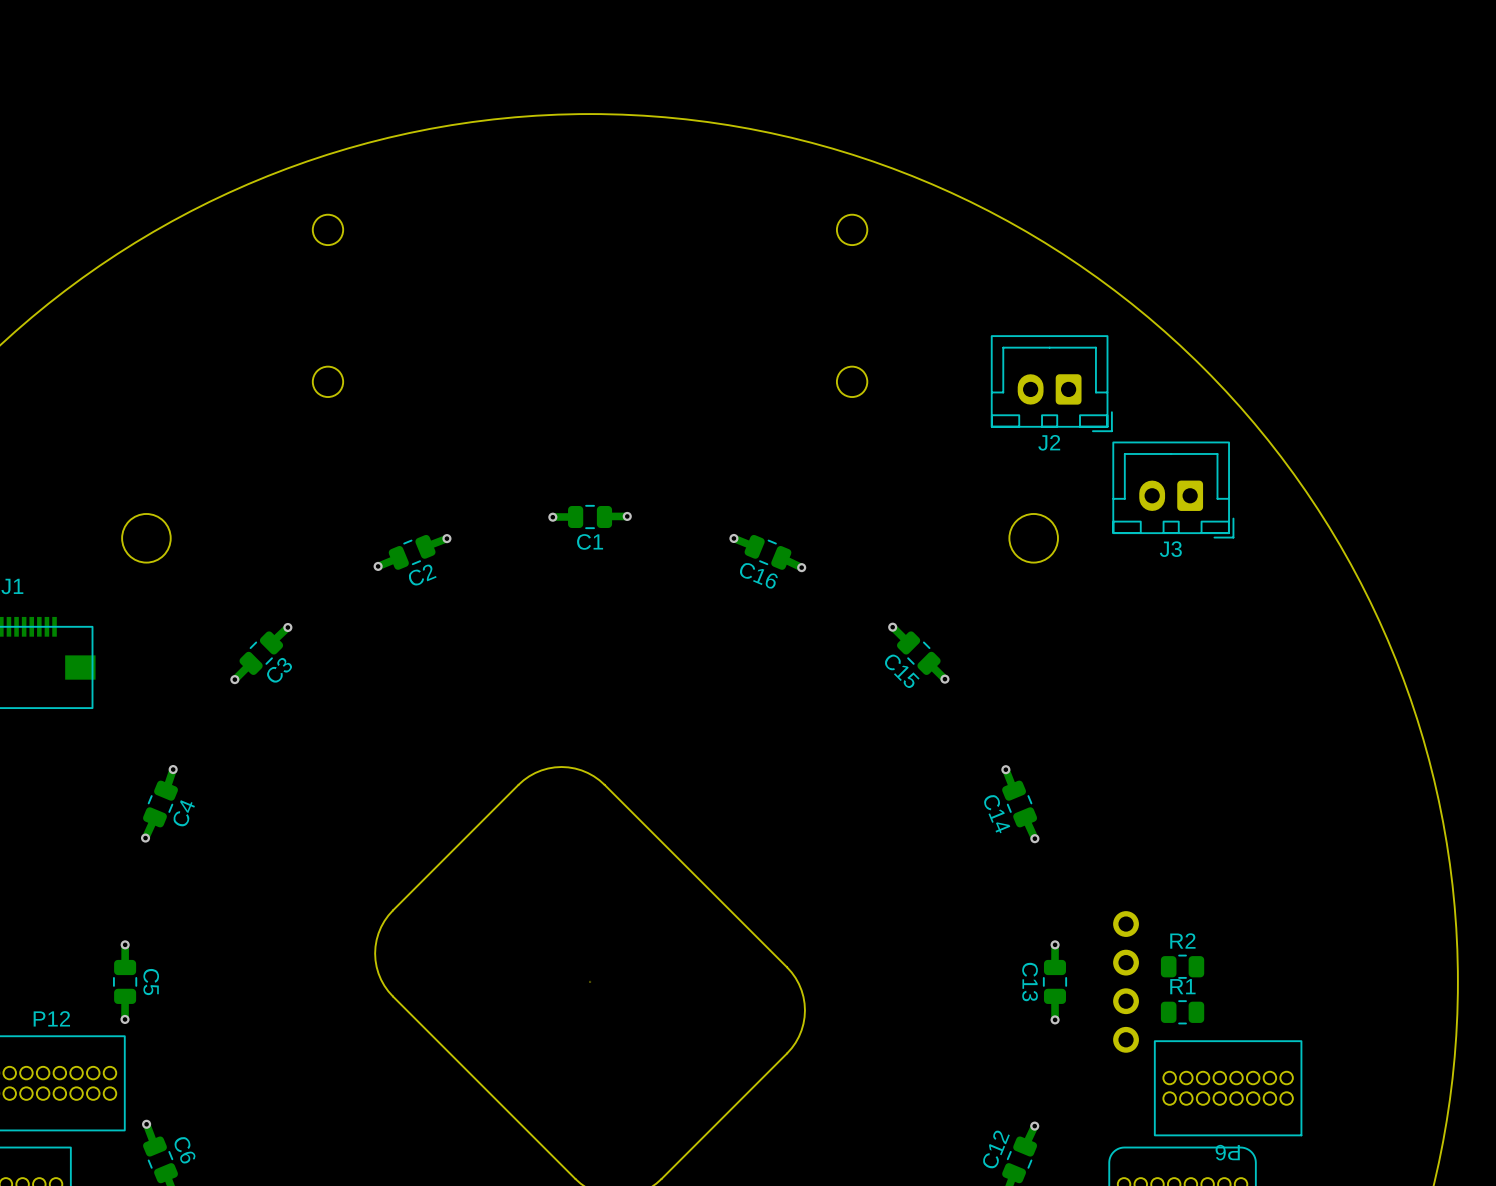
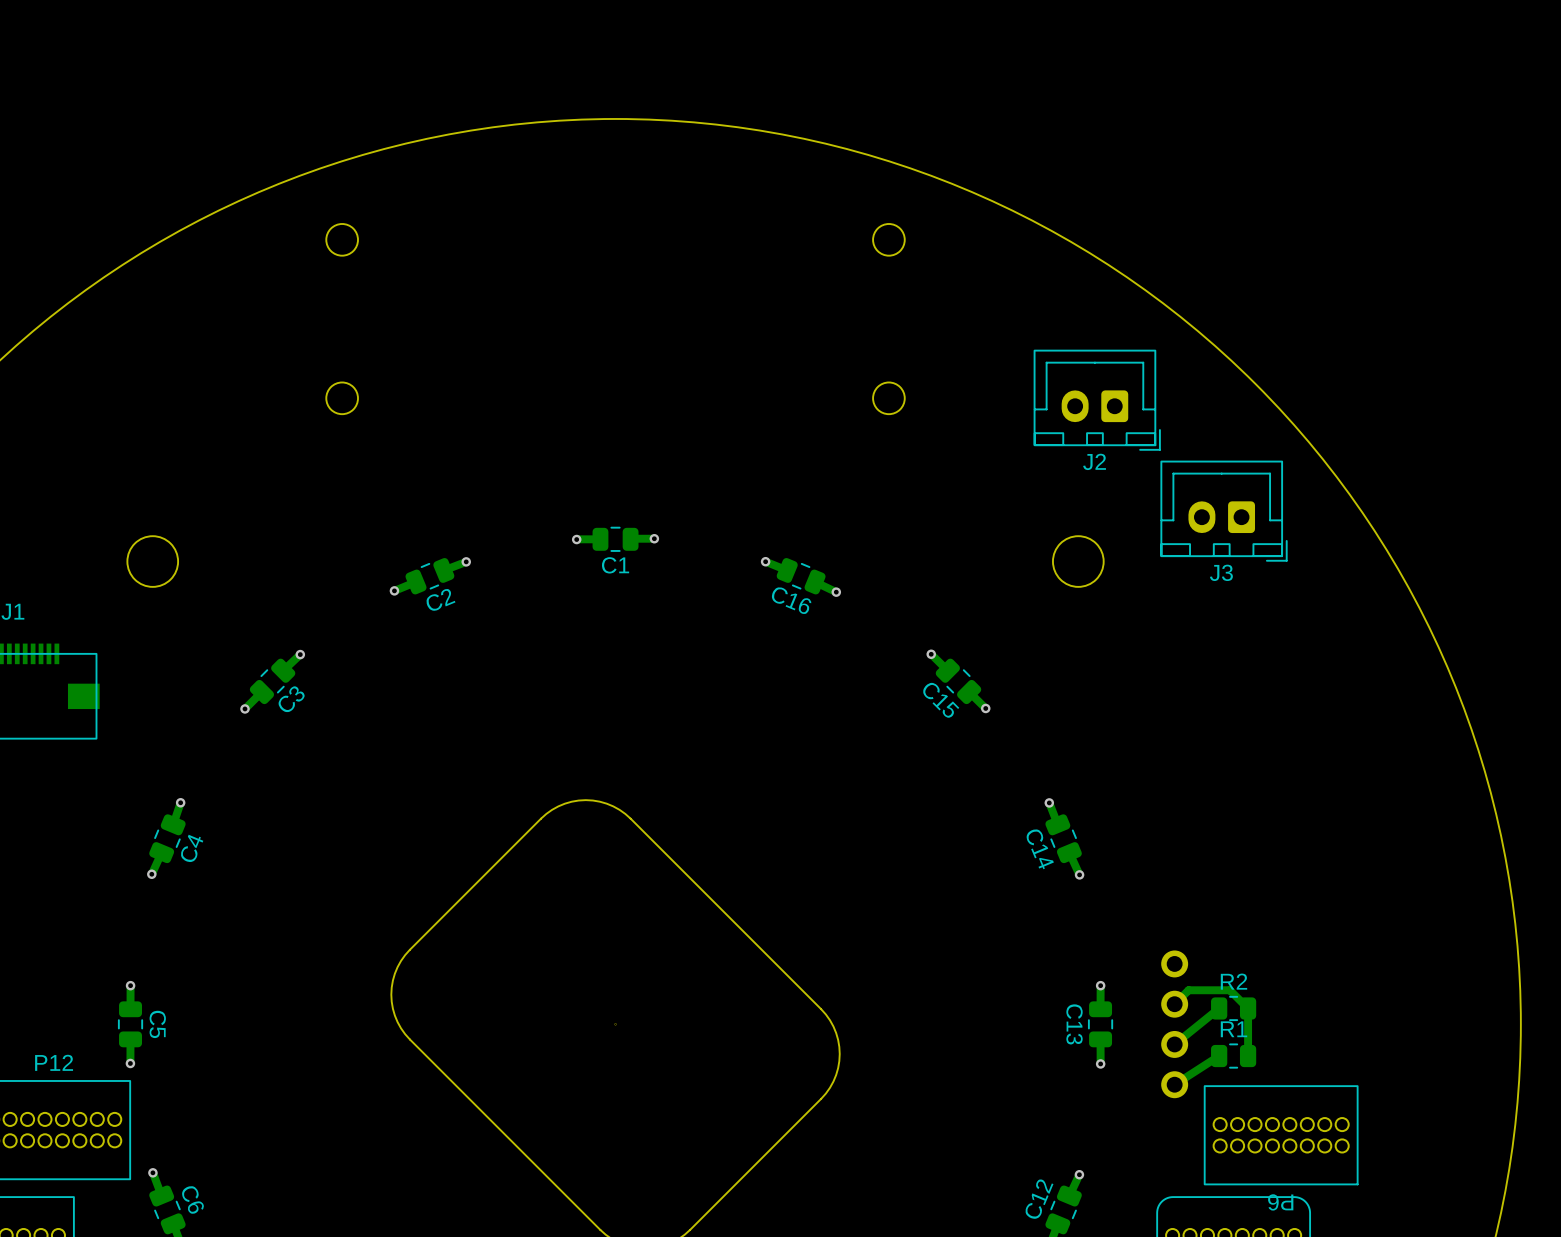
track: none -> (1174, 1004) (1188, 990) (1229, 990) (1248, 1008) (1248, 1056)
track: none -> (1219, 1008) (1174, 1044)
track: none -> (1219, 1056) (1174, 1084)

